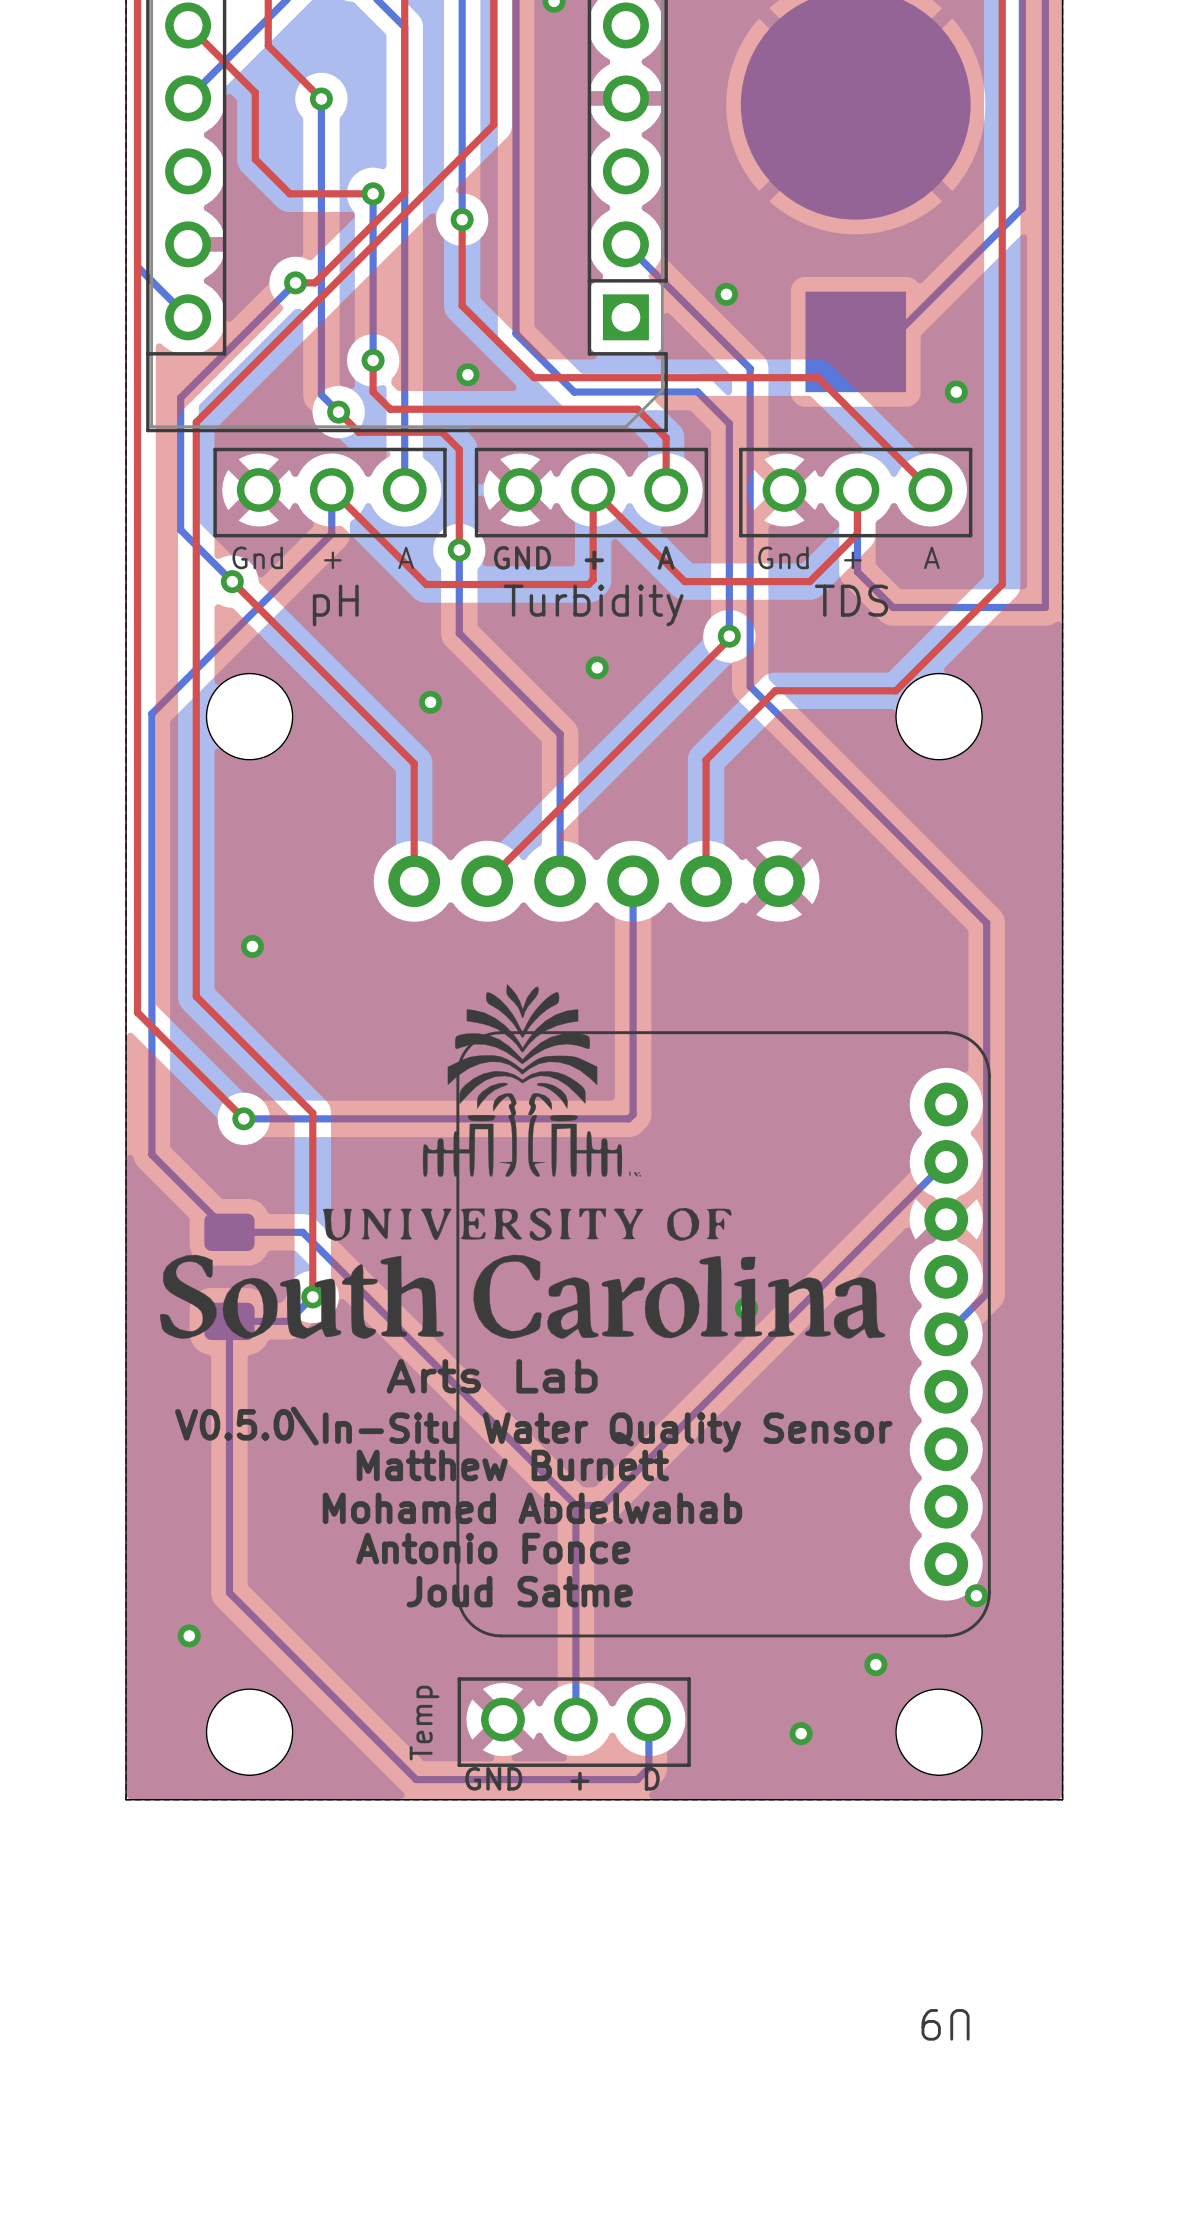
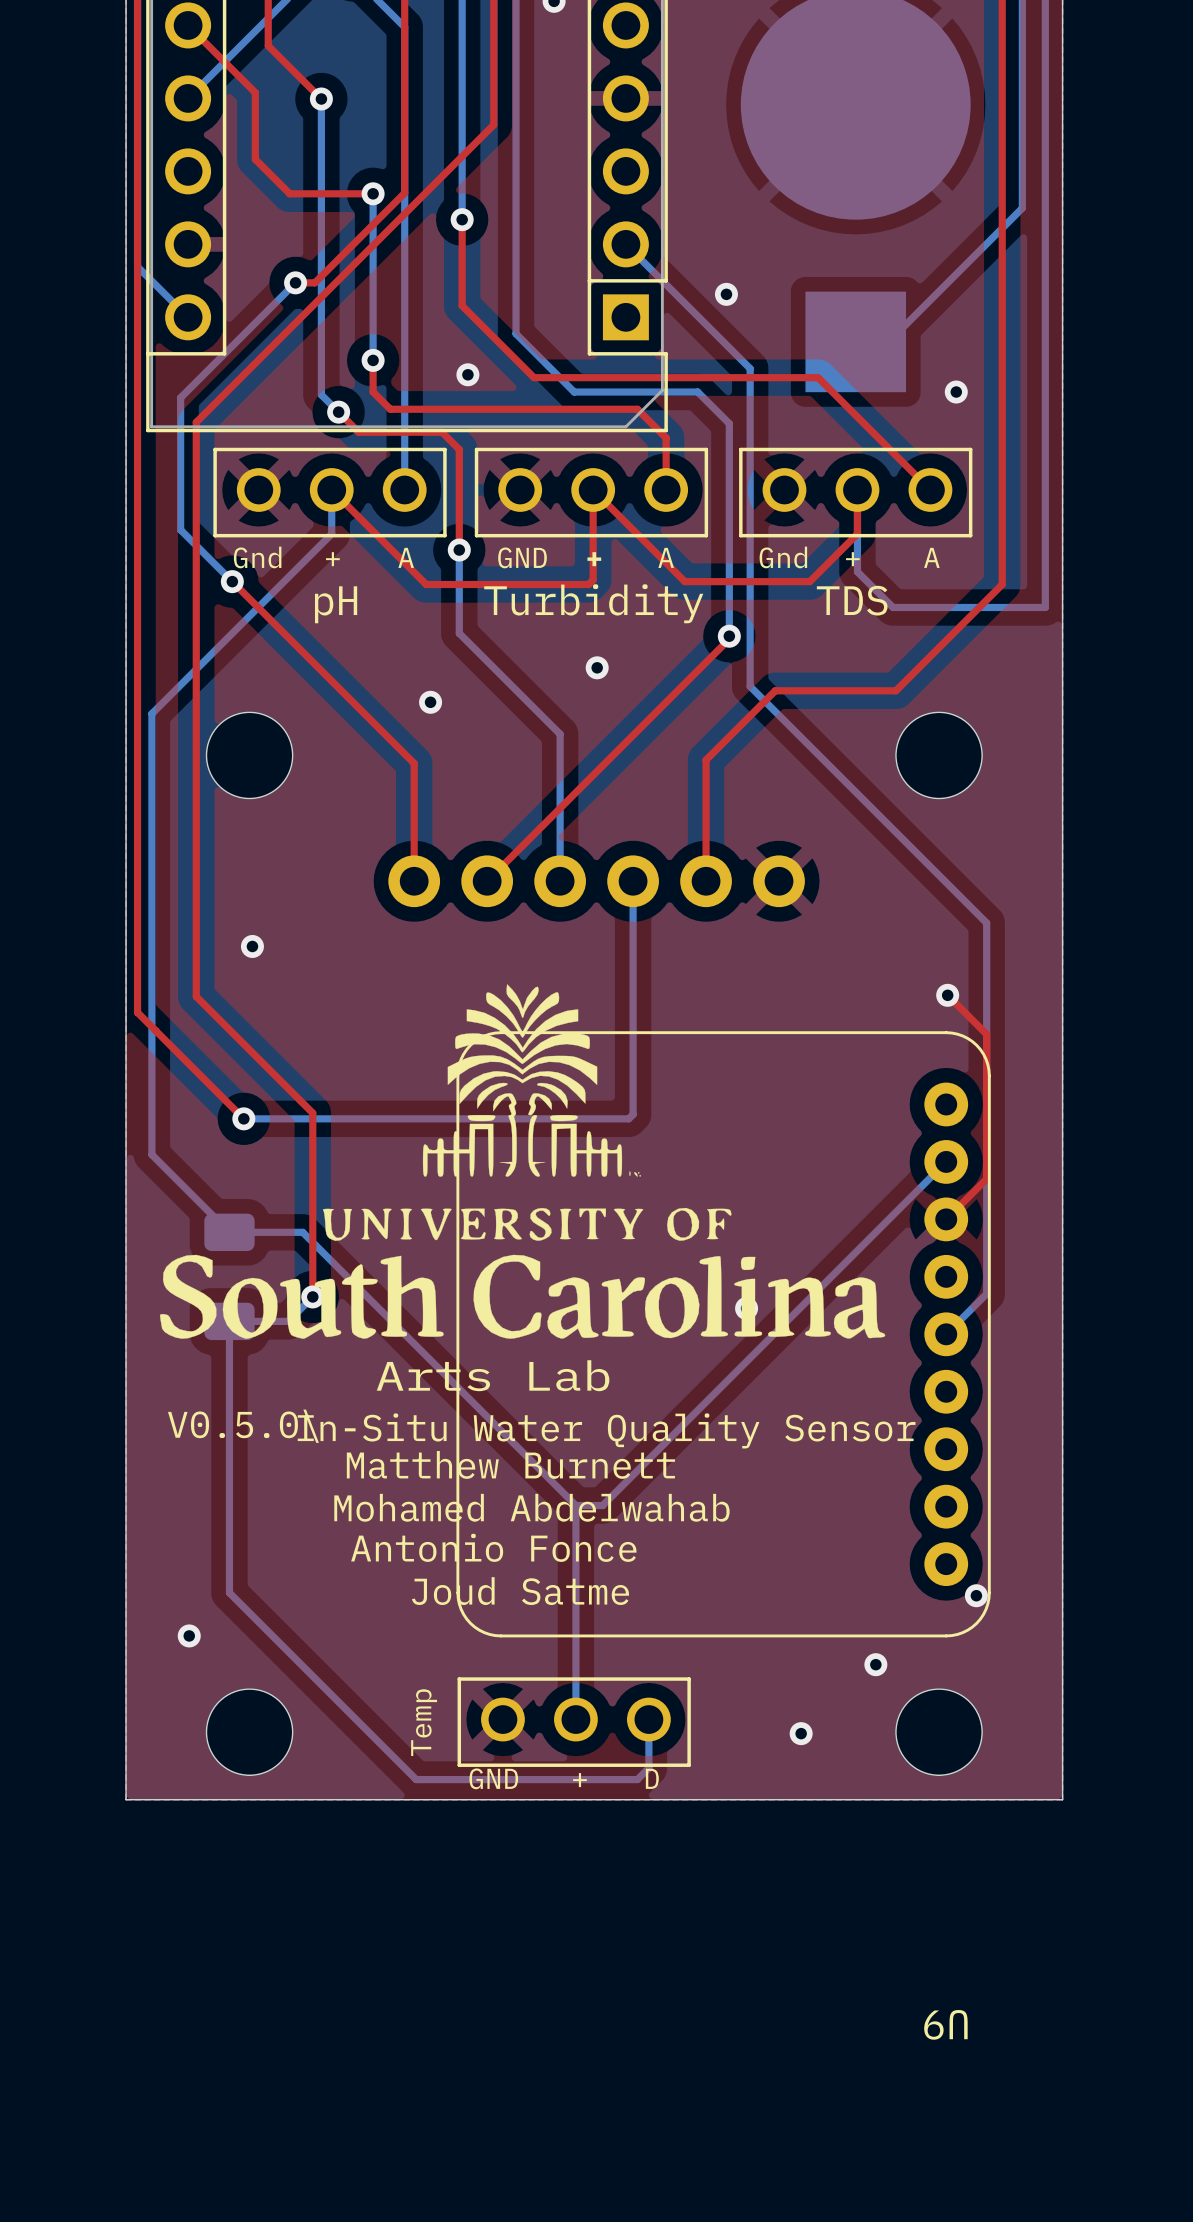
round board edge position: (249, 716) -> (249, 755)
round board edge position: (939, 716) -> (939, 755)
top track: none -> (947, 995) (986, 1034) (986, 1178) (946, 1219)
via: none -> (947, 995)

